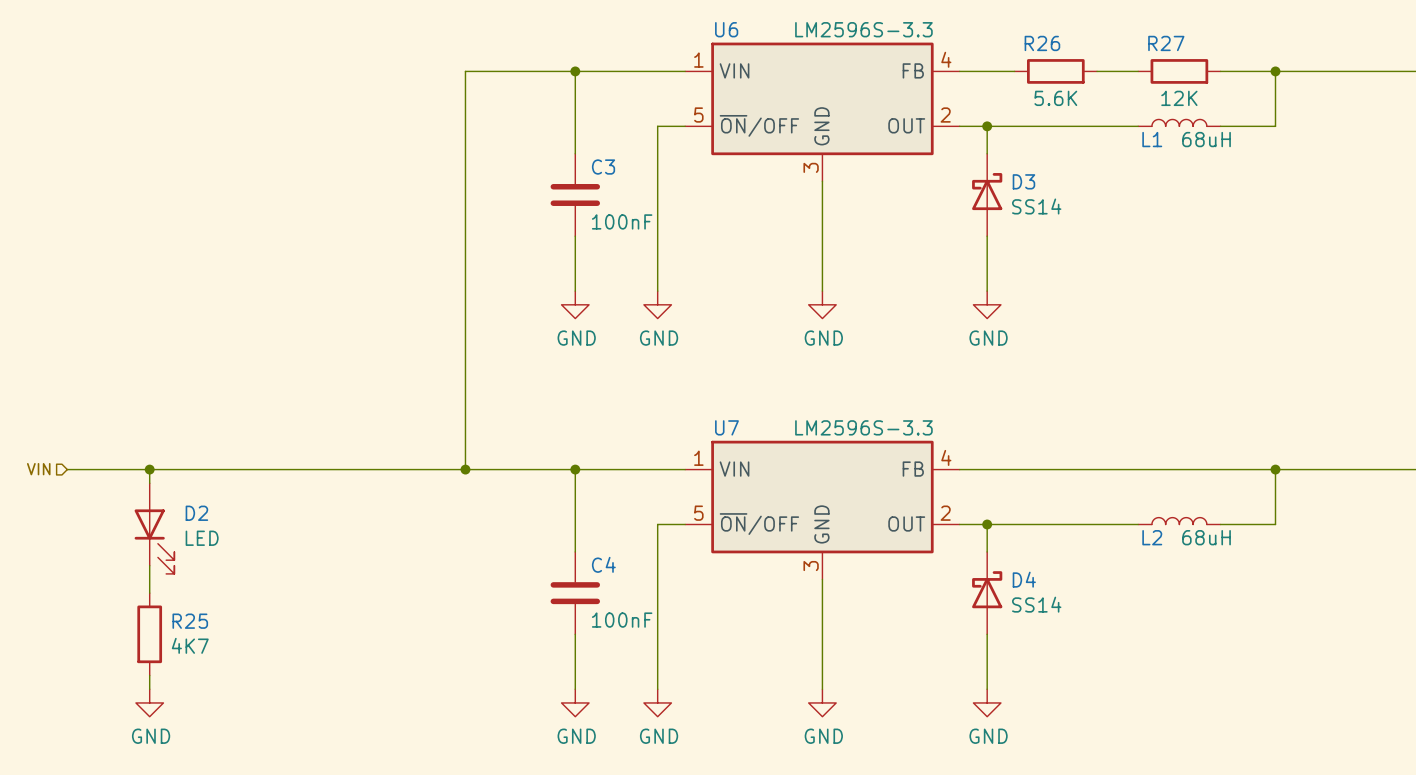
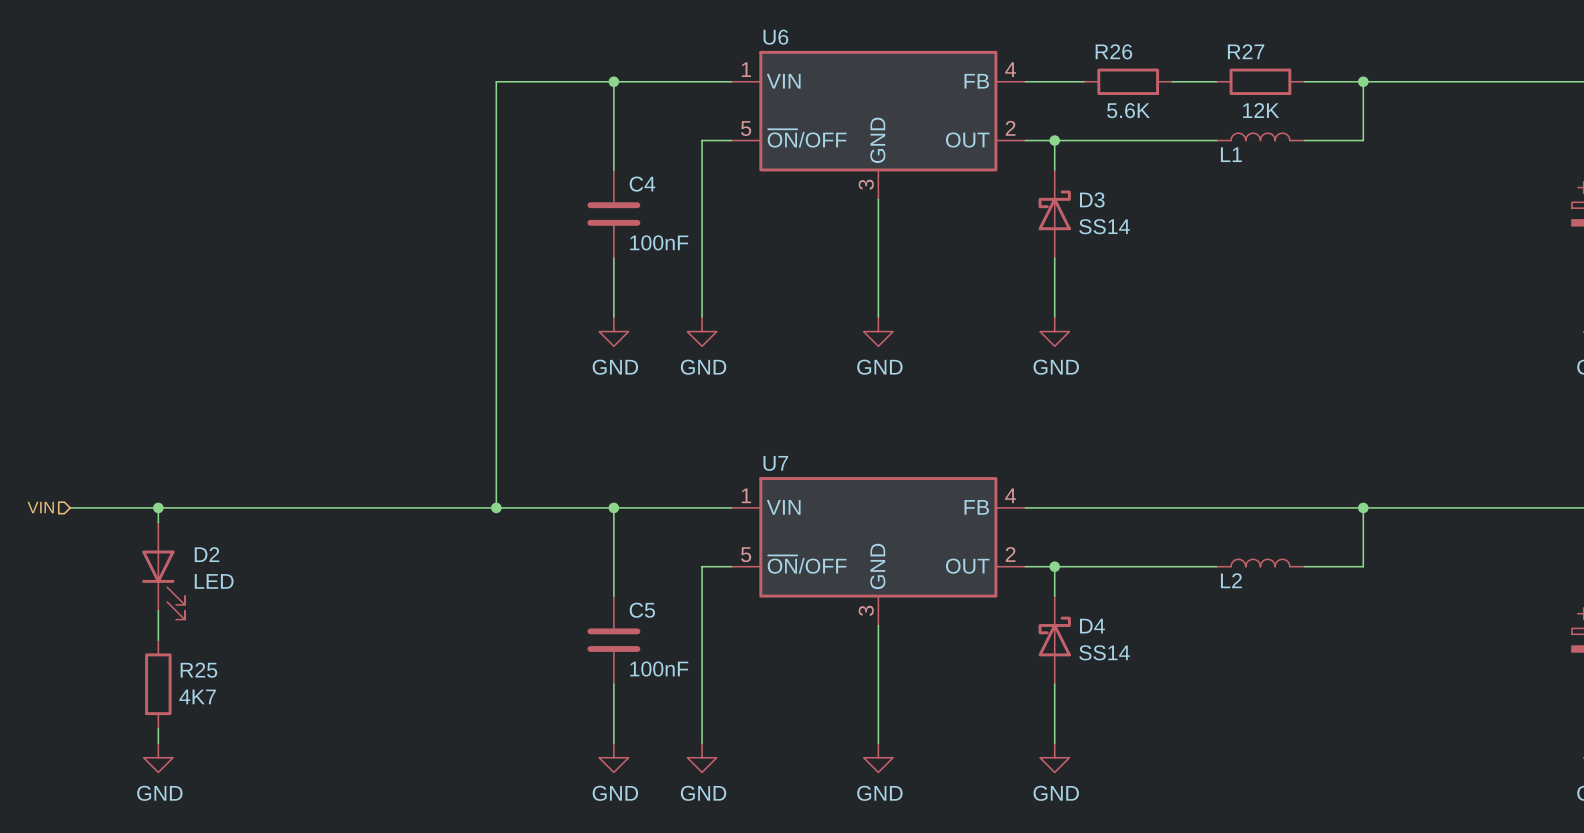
U6 value: LM2596S-3.3 (863, 29) -> none
L1 value: 68uH (1206, 139) -> none
C3 name: C3 (603, 167) -> C4 (642, 184)
U7 value: LM2596S-3.3 (863, 427) -> none
L2 value: 68uH (1206, 537) -> none
C4 name: C4 (603, 564) -> C5 (642, 610)

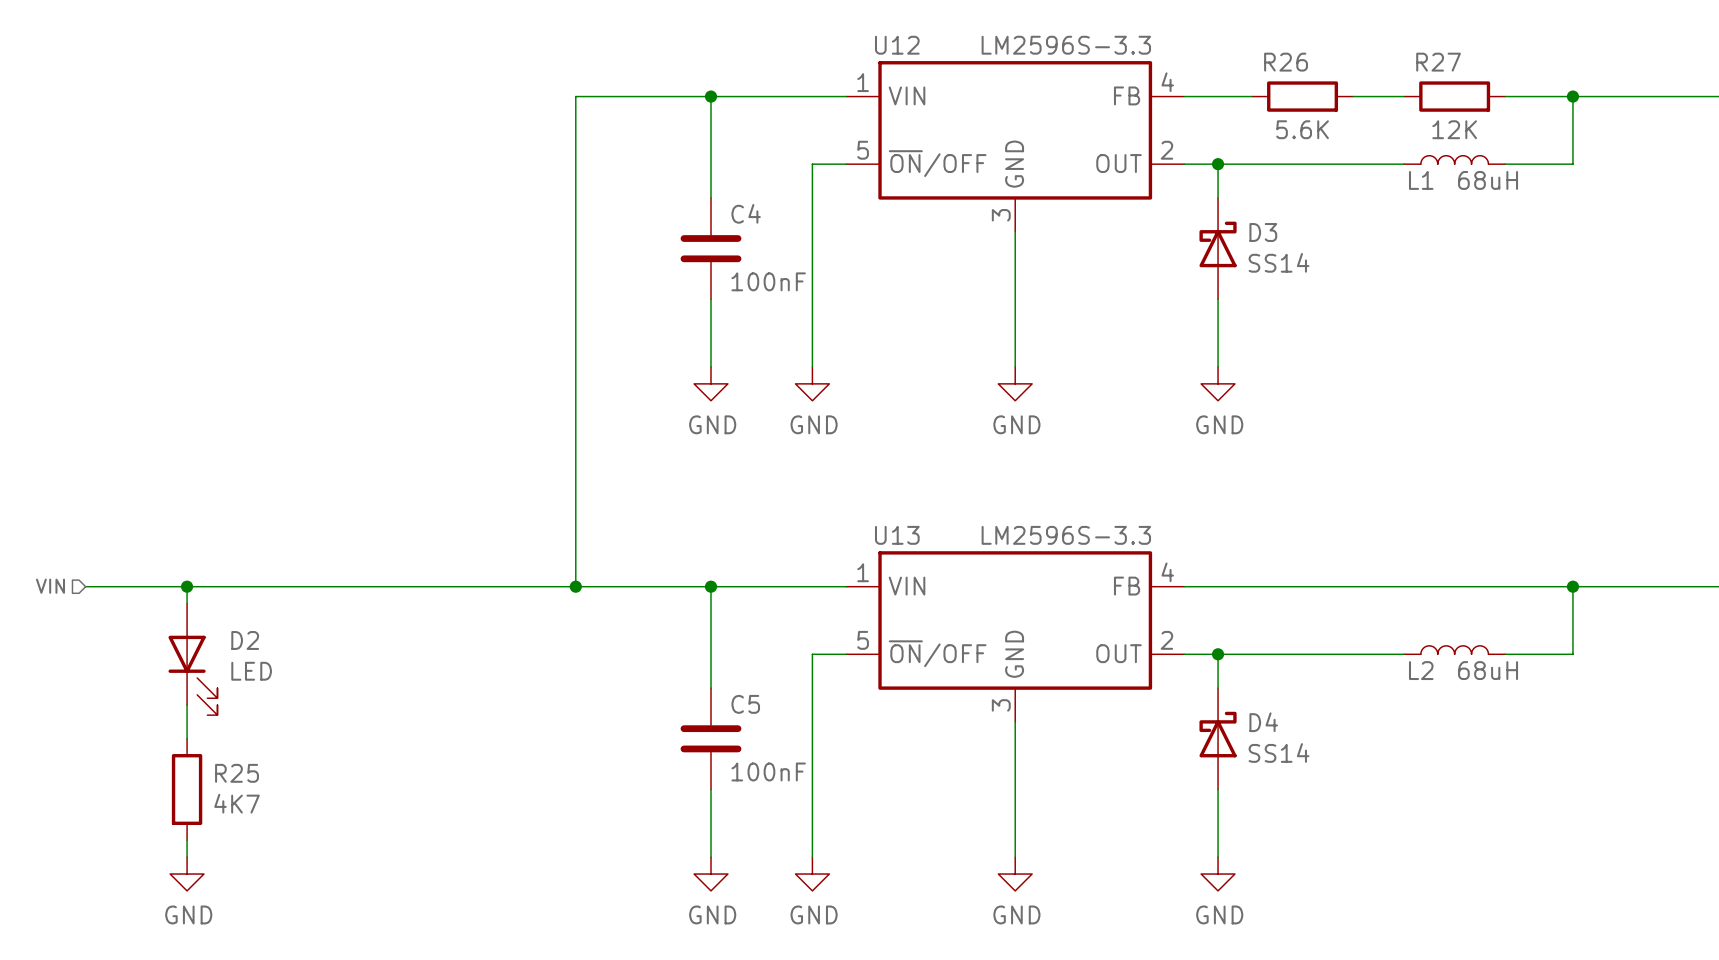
U6 name: U6 (775, 37) -> U12 (897, 45)
U6 value: none -> LM2596S-3.3 (1066, 45)
L1 value: none -> 68uH (1488, 180)
U7 name: U7 (775, 463) -> U13 (897, 535)
U7 value: none -> LM2596S-3.3 (1066, 535)
L2 value: none -> 68uH (1488, 670)

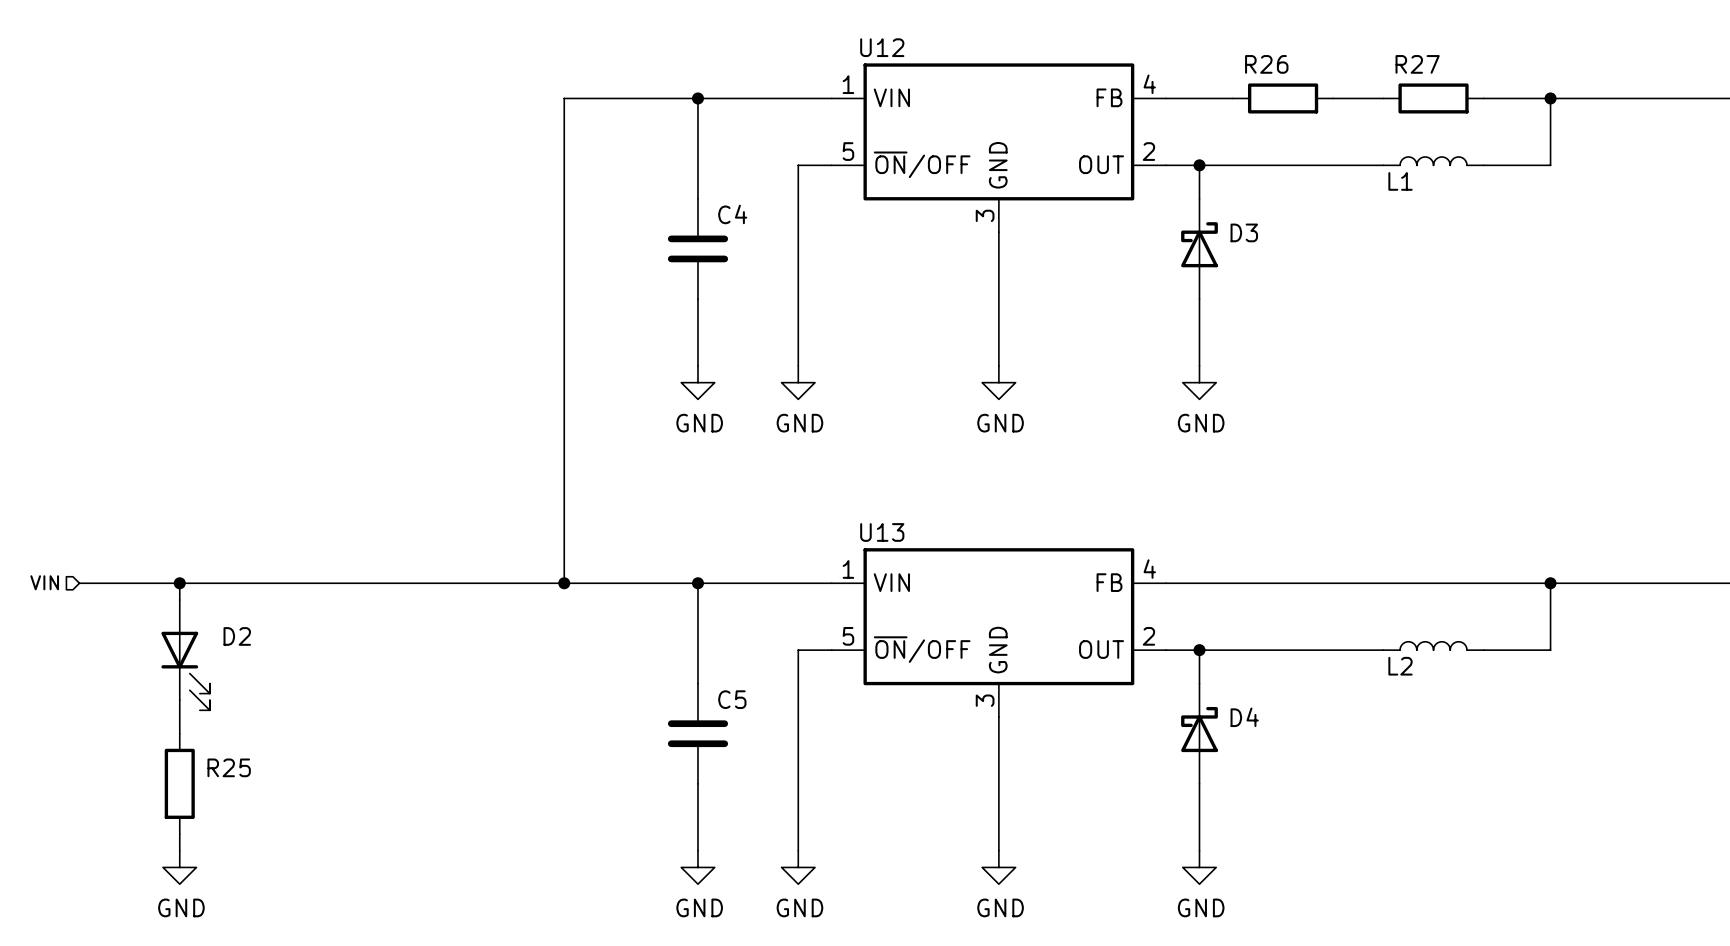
U12 value: LM2596S-3.3 (1066, 45) -> none
R26 value: 5.6K (1302, 129) -> none
R27 value: 12K (1454, 129) -> none
L1 value: 68uH (1488, 180) -> none
D3 value: SS14 (1279, 262) -> none
C4 value: 100nF (768, 281) -> none
U13 value: LM2596S-3.3 (1066, 535) -> none
L2 value: 68uH (1488, 670) -> none
D2 value: LED (251, 671) -> none
D4 value: SS14 (1279, 752) -> none
C5 value: 100nF (768, 771) -> none
R25 value: 4K7 (237, 803) -> none

